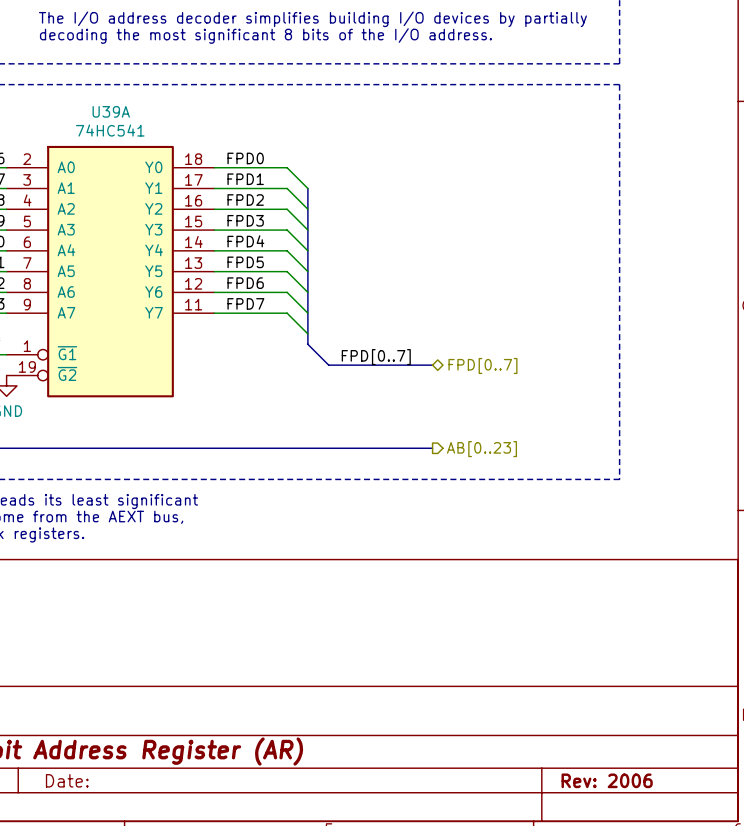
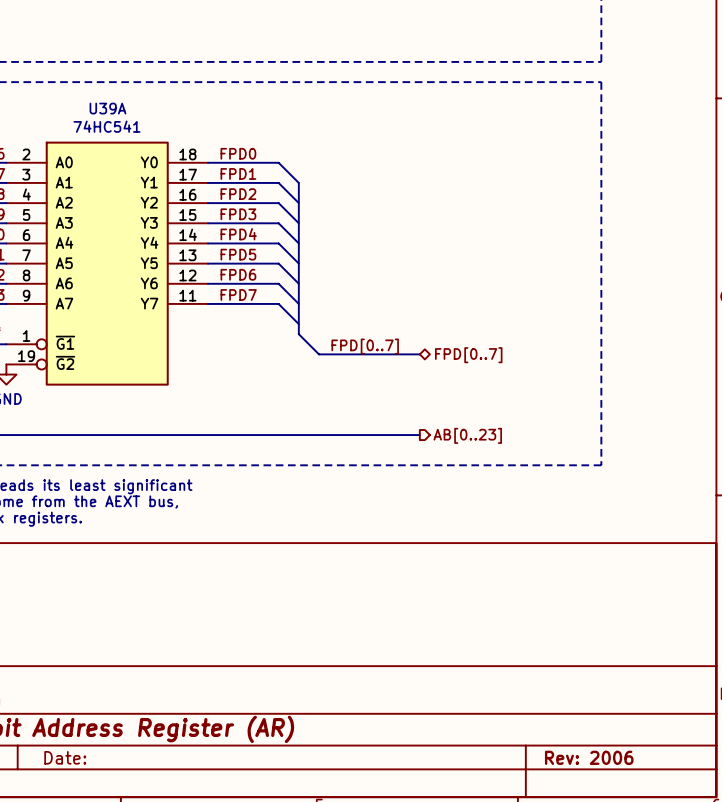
text: The I/O address decoder simplifies building I/O devices by partially (312, 19) -> none
text: decoding the most significant 8 bits of the I/O address. (265, 36) -> none

